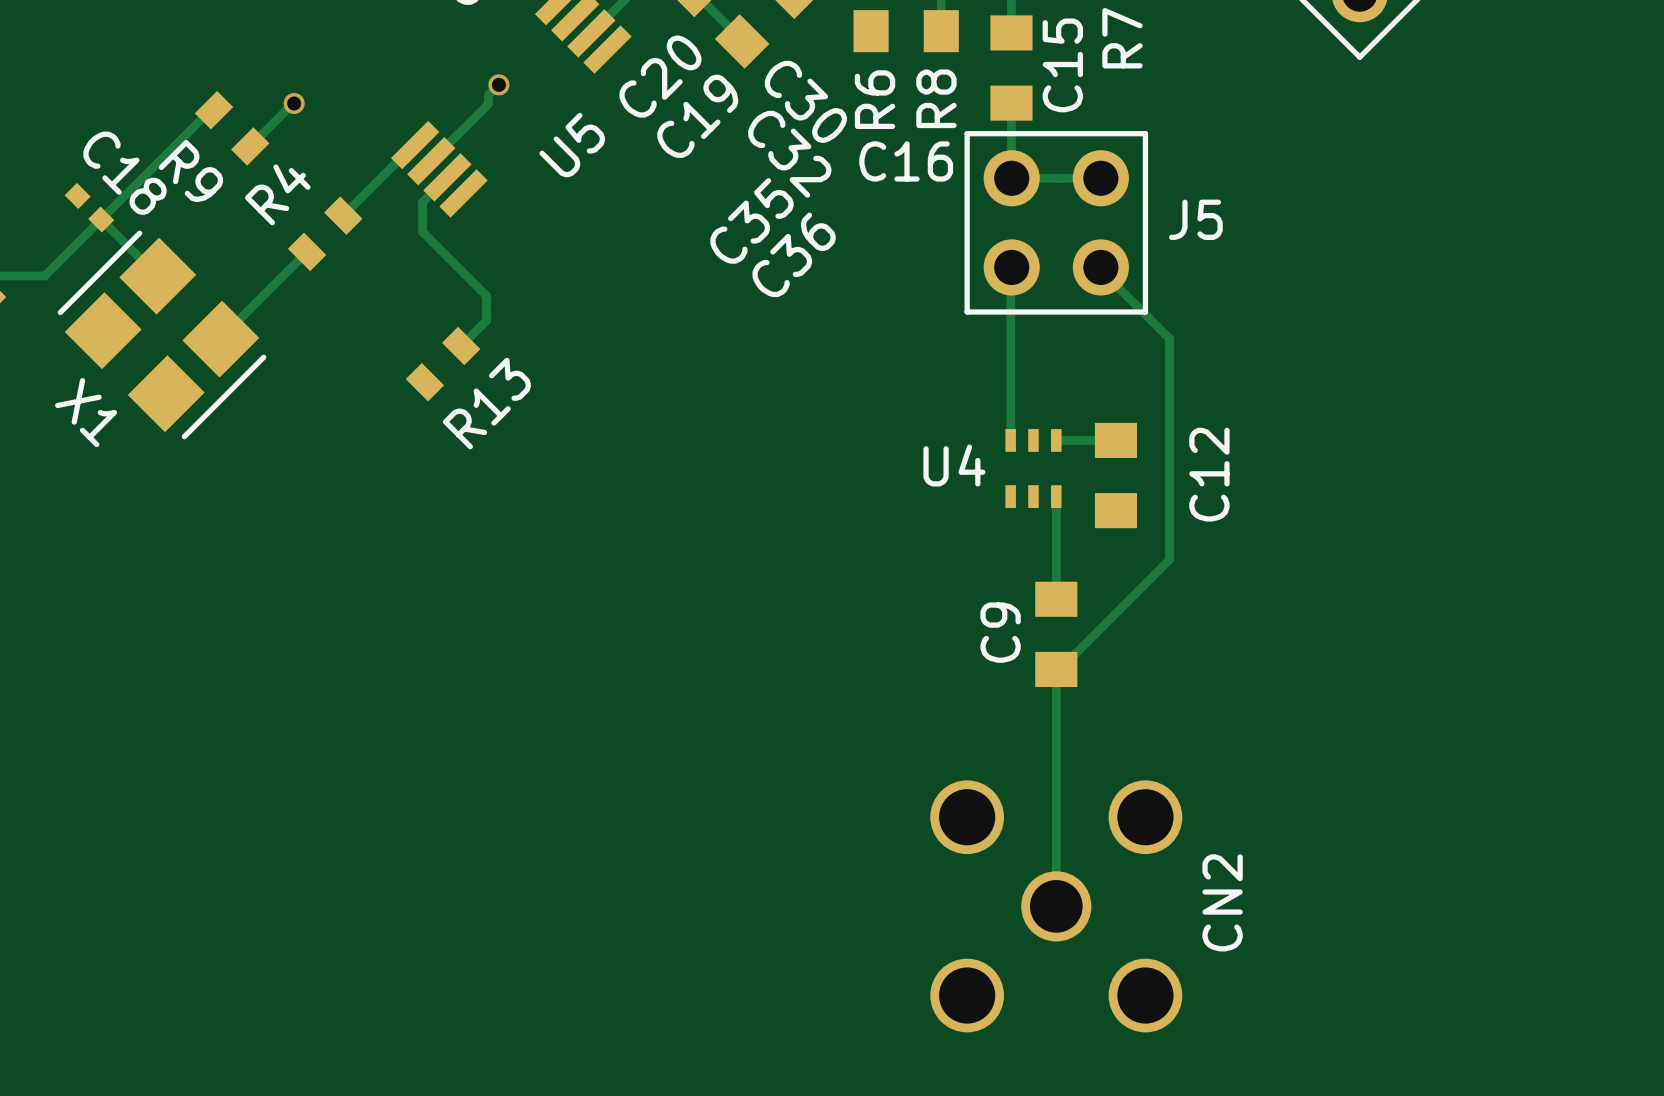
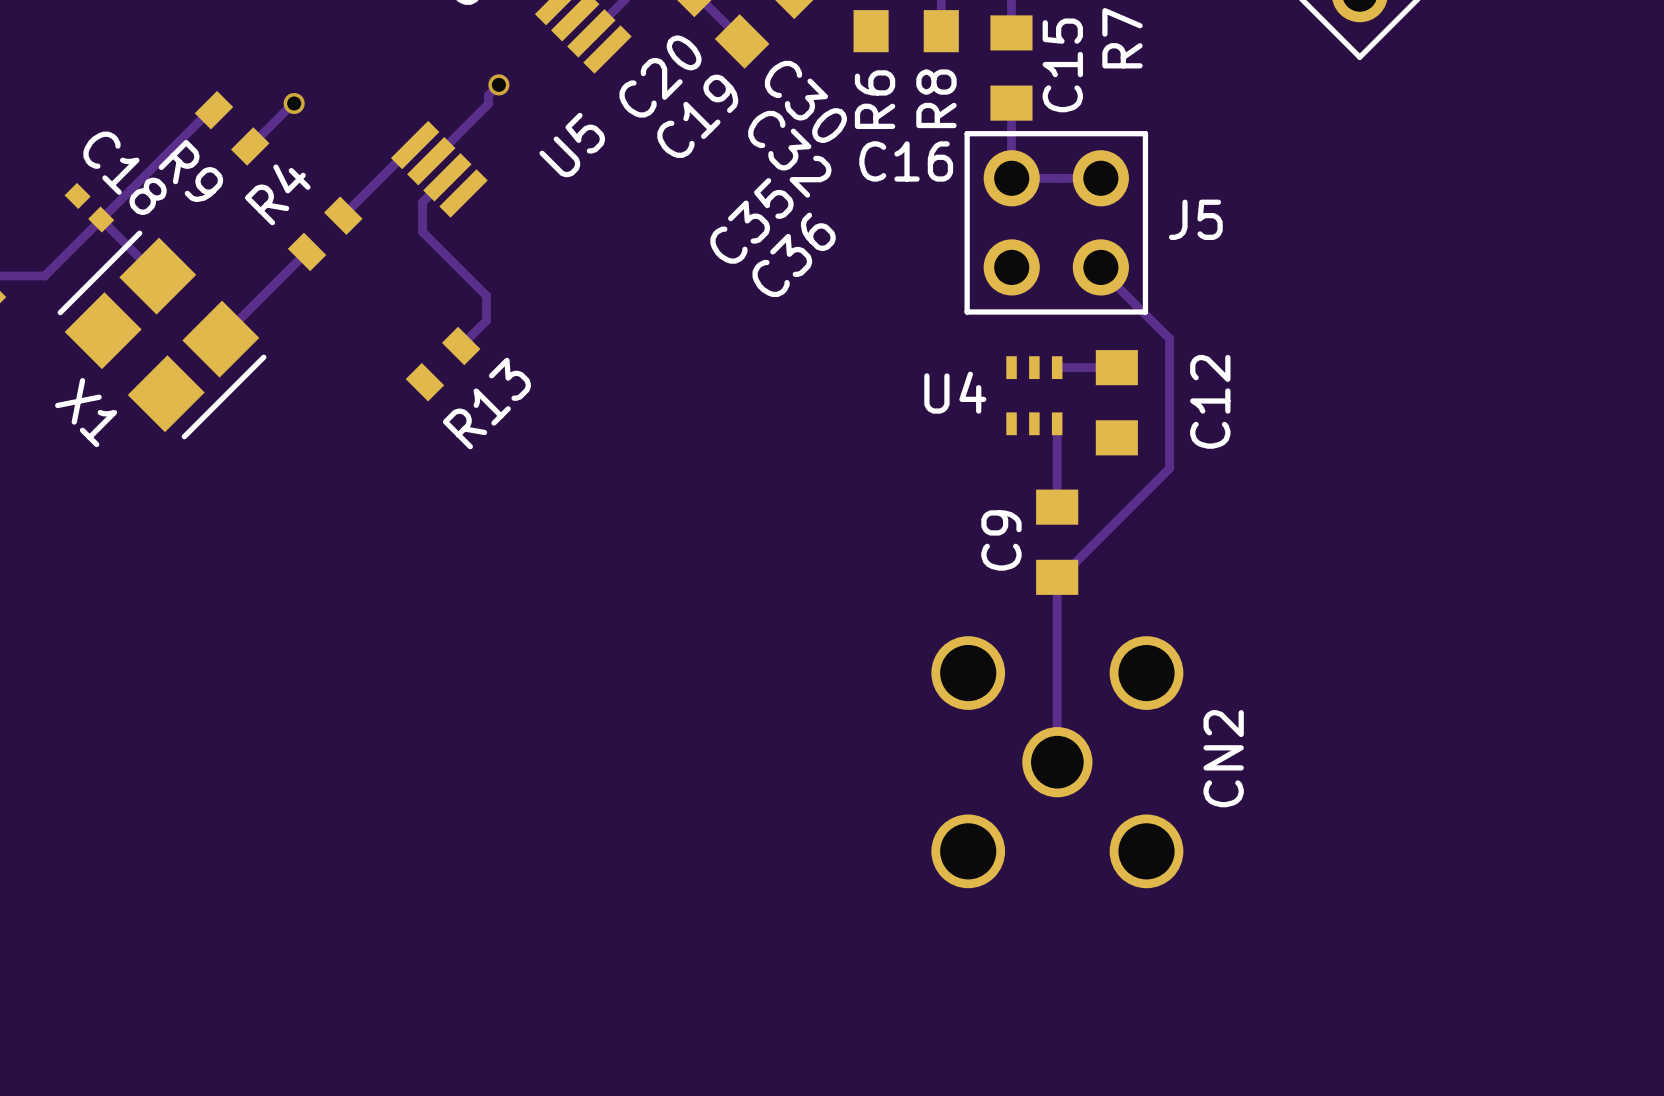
track: (1010, 269) (1010, 440) -> none
track: none -> (1057, 423) (1057, 507)
track: (1056, 440) (1104, 440) -> (1057, 367) (1105, 367)
U4 position: (1033, 468) -> (1034, 395)
track: (1169, 468) (1169, 559) (1059, 669) (1056, 669) (1056, 906) -> (1169, 468) (1060, 577) (1057, 577) (1057, 762)
C12 position: (1115, 475) -> (1116, 402)
track: (1056, 496) (1056, 599) -> none
C9 position: (1056, 634) -> (1057, 542)
CN2 position: (1056, 906) -> (1057, 762)

